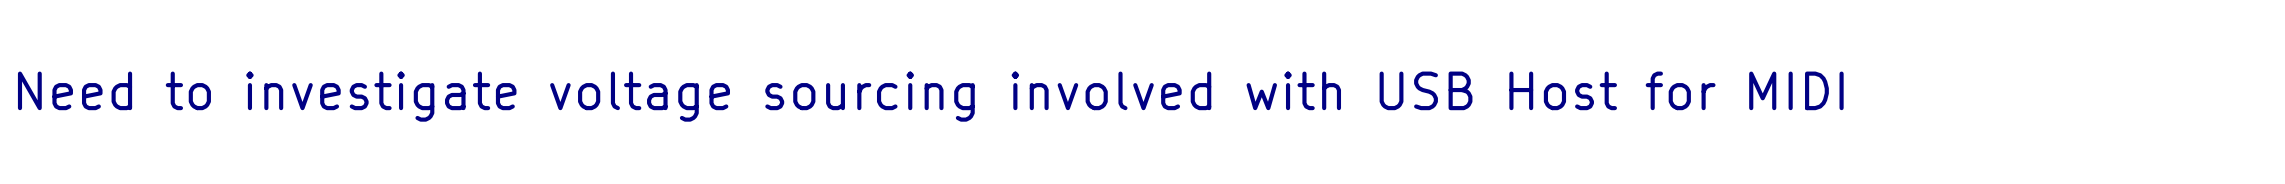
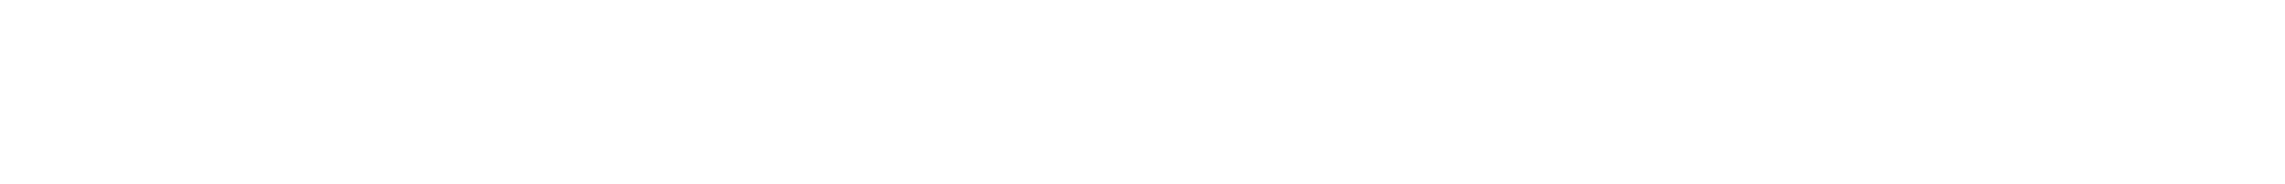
text: Need to investigate voltage sourcing involved with USB Host for MIDI (930, 96) -> none

